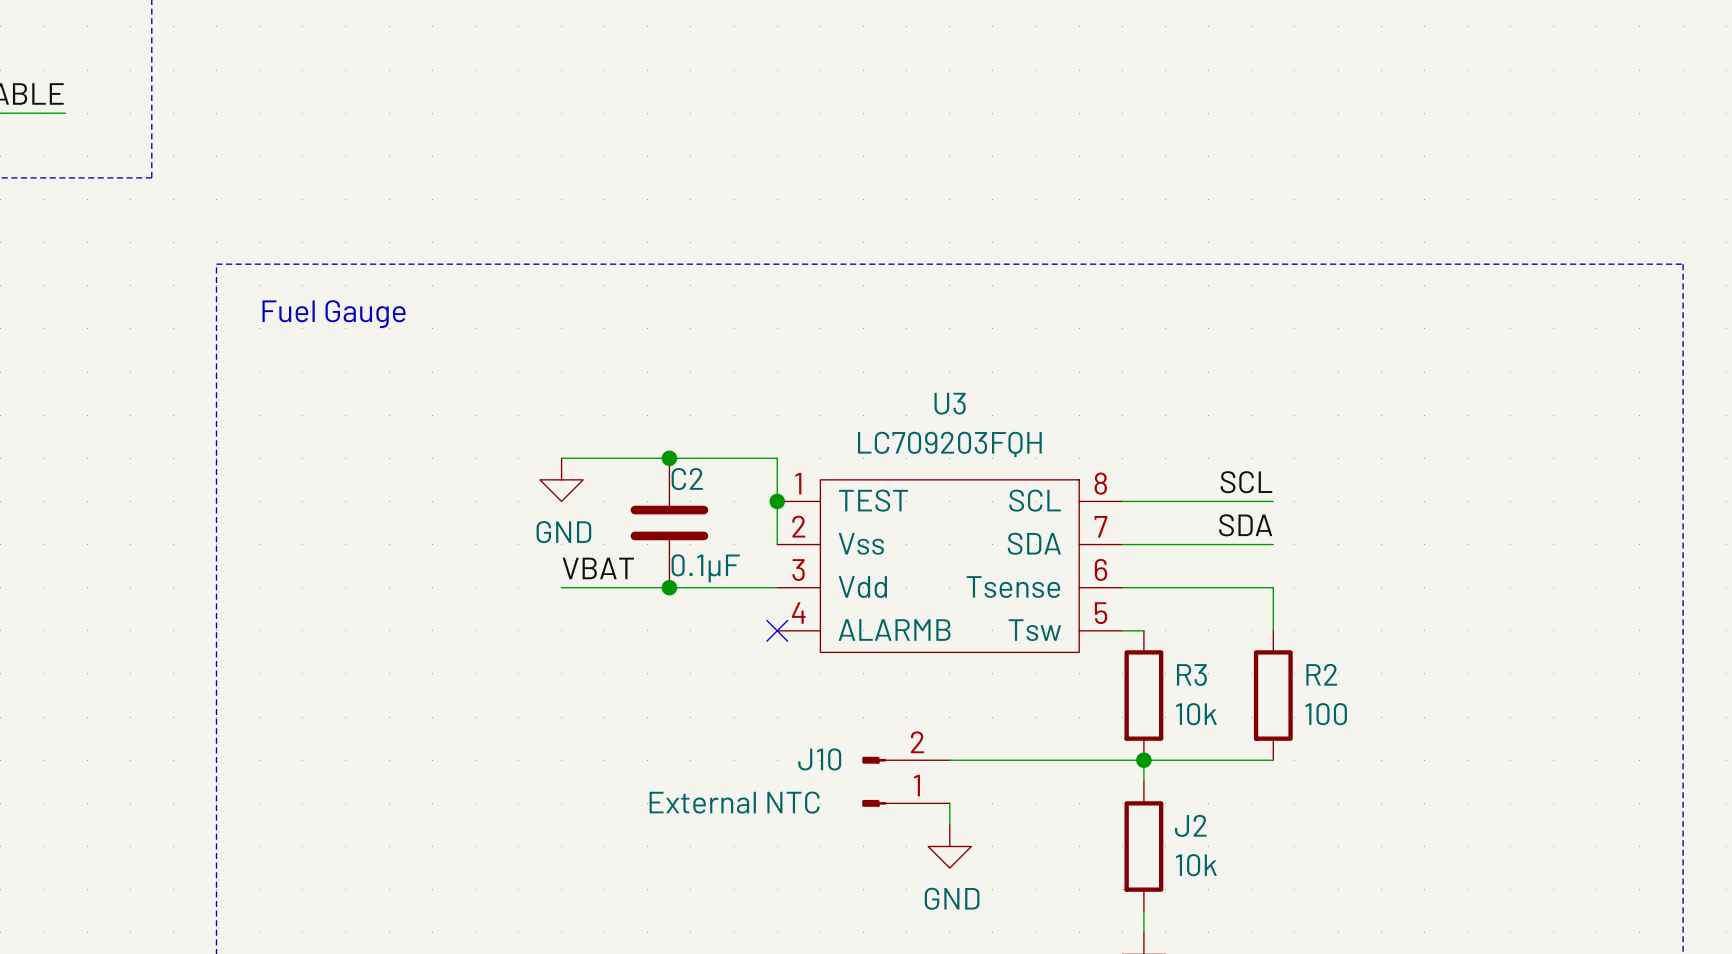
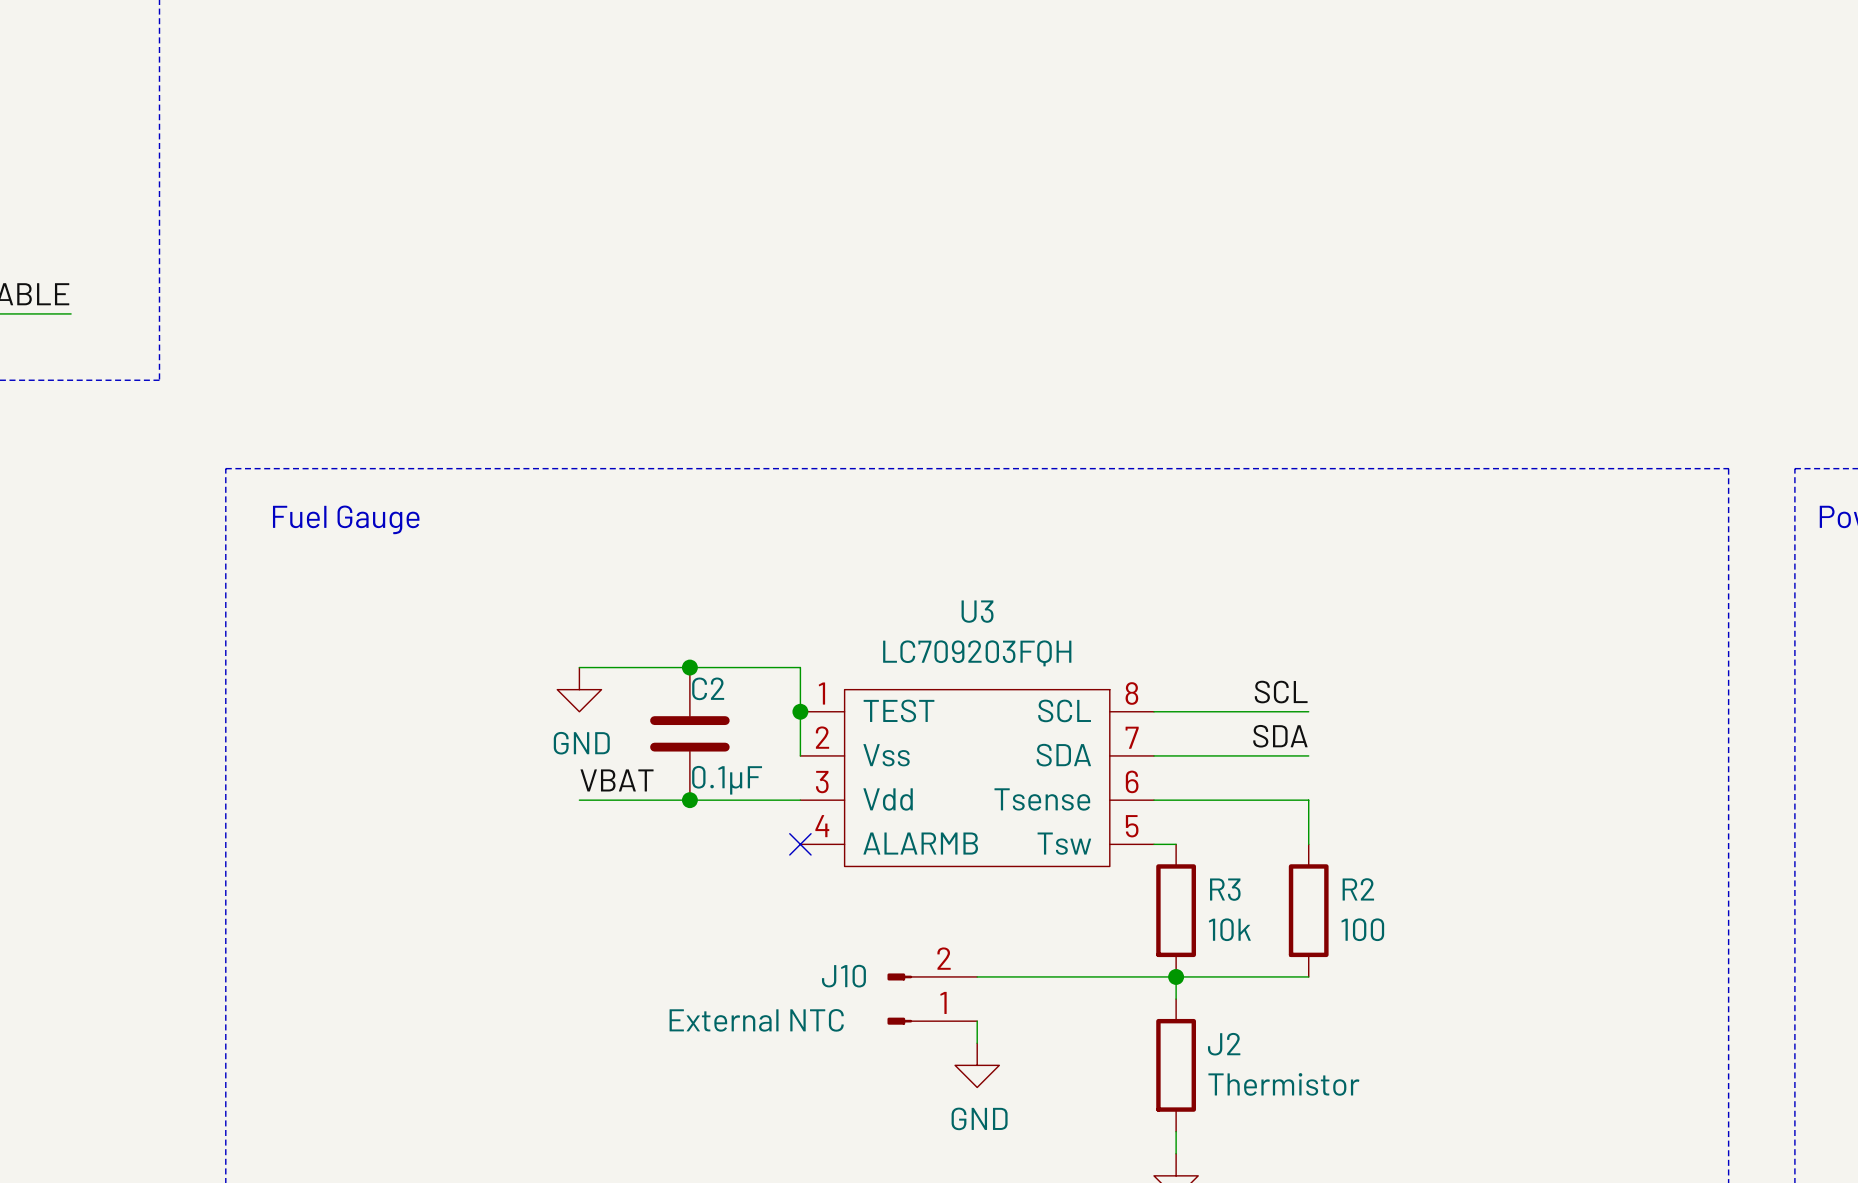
J2 value: 10k (1196, 865) -> Thermistor (1283, 1084)

